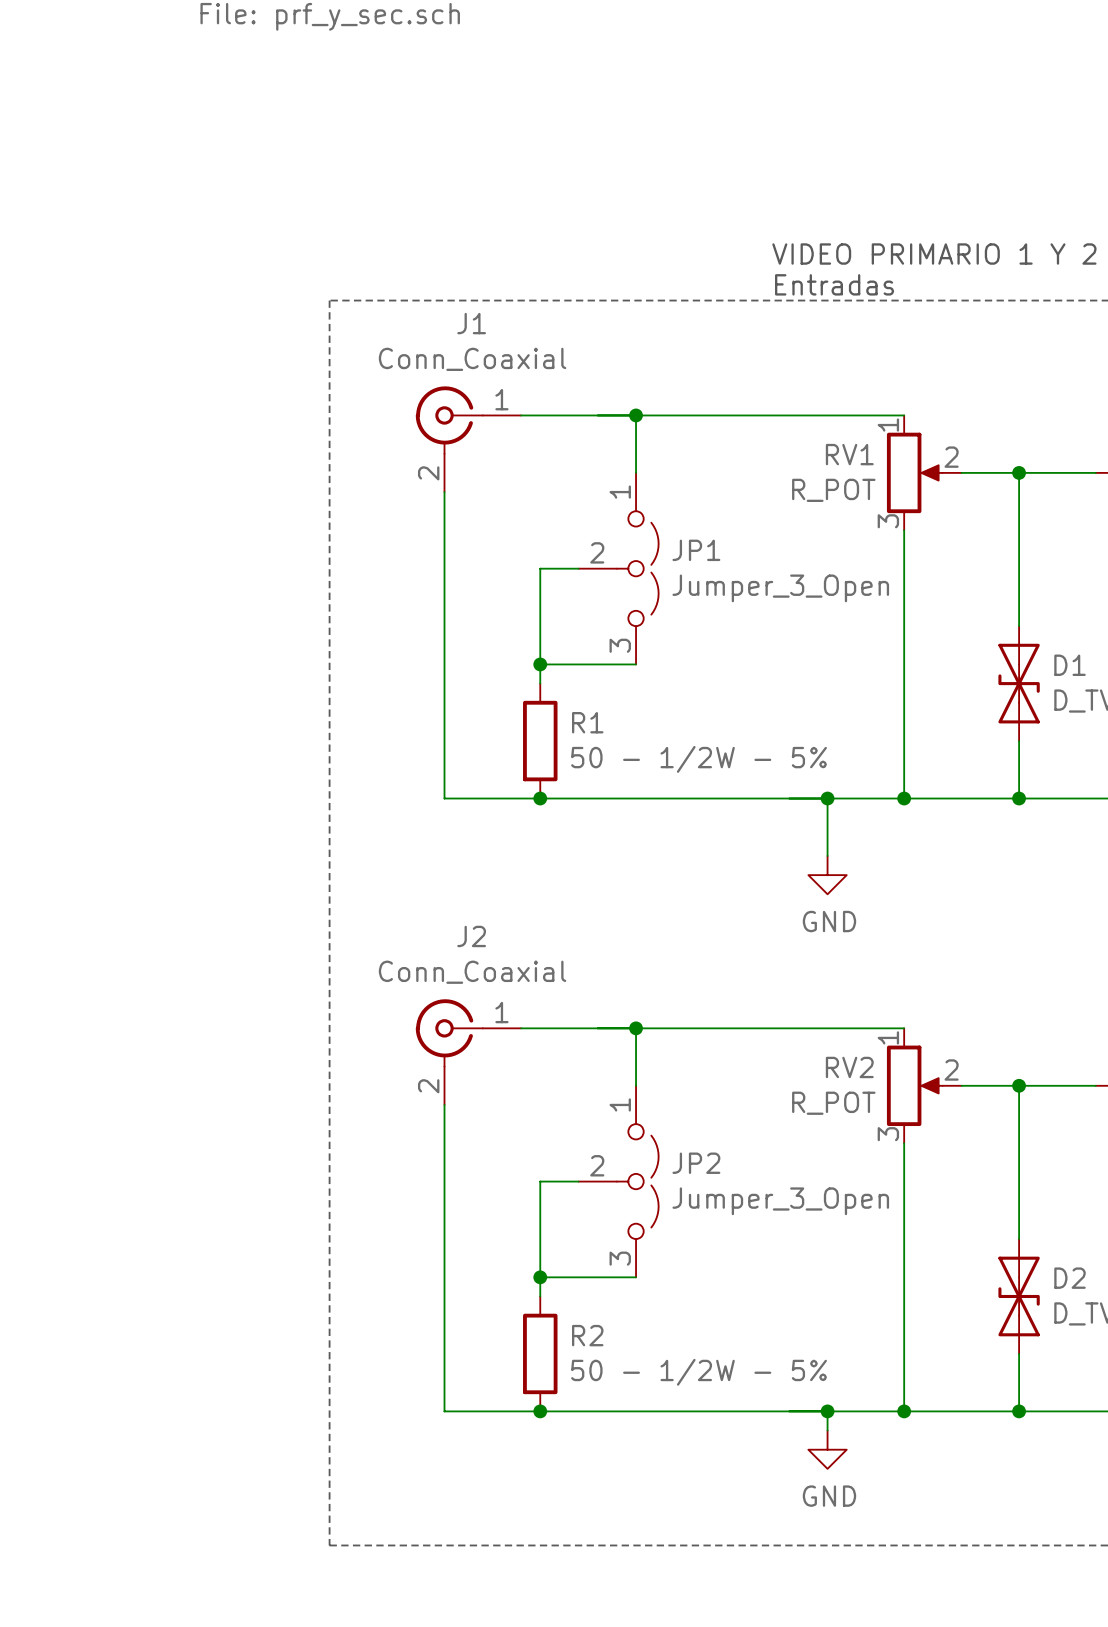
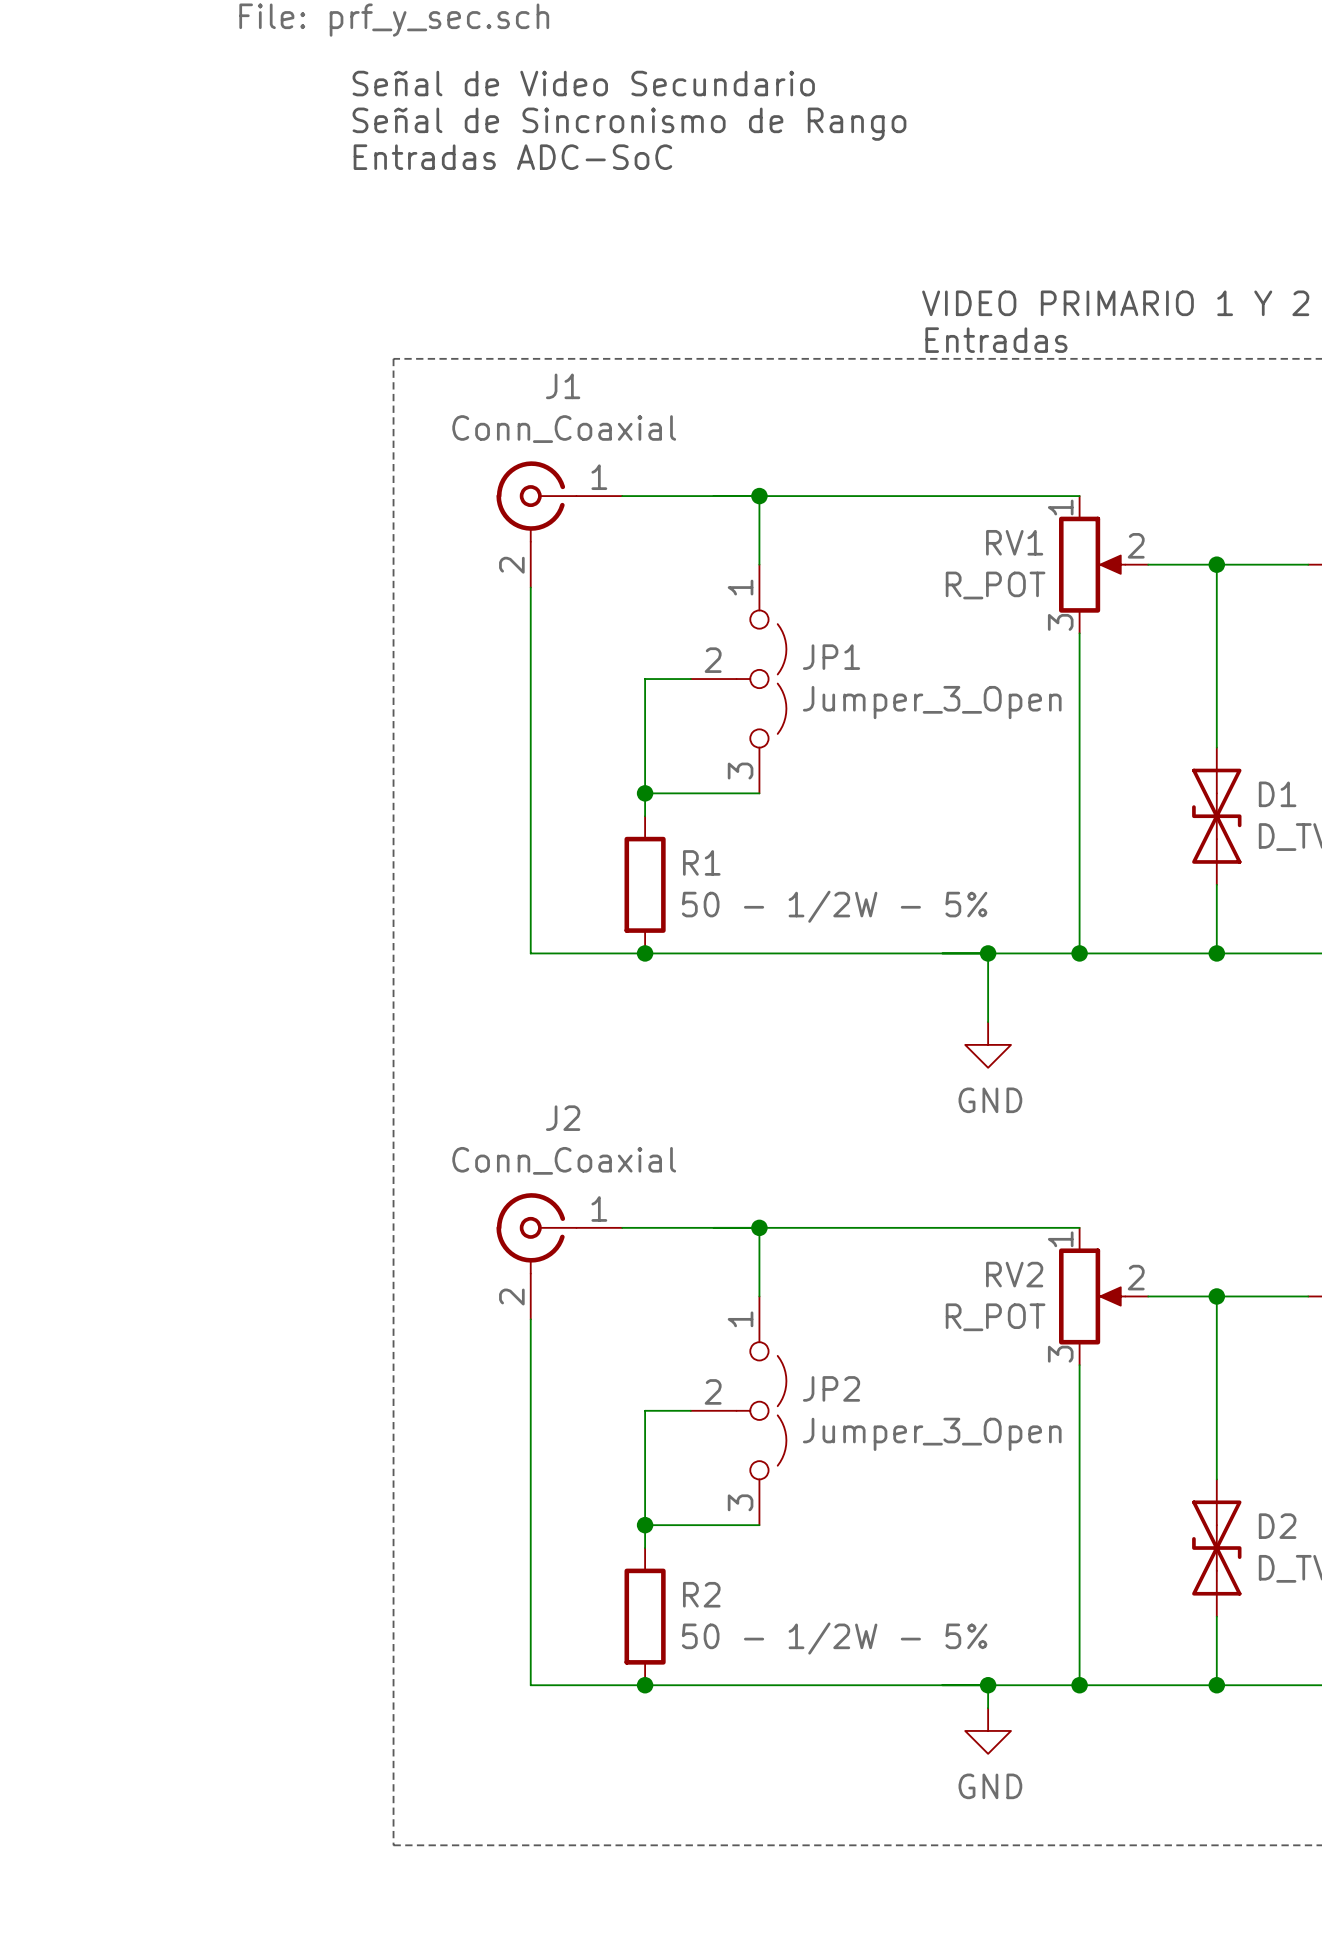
text: none -> Señal de Video Secundario (583, 83)
text: none -> Señal de Sincronismo de Rango (629, 124)
text: none -> Entradas ADC-SoC (512, 157)

